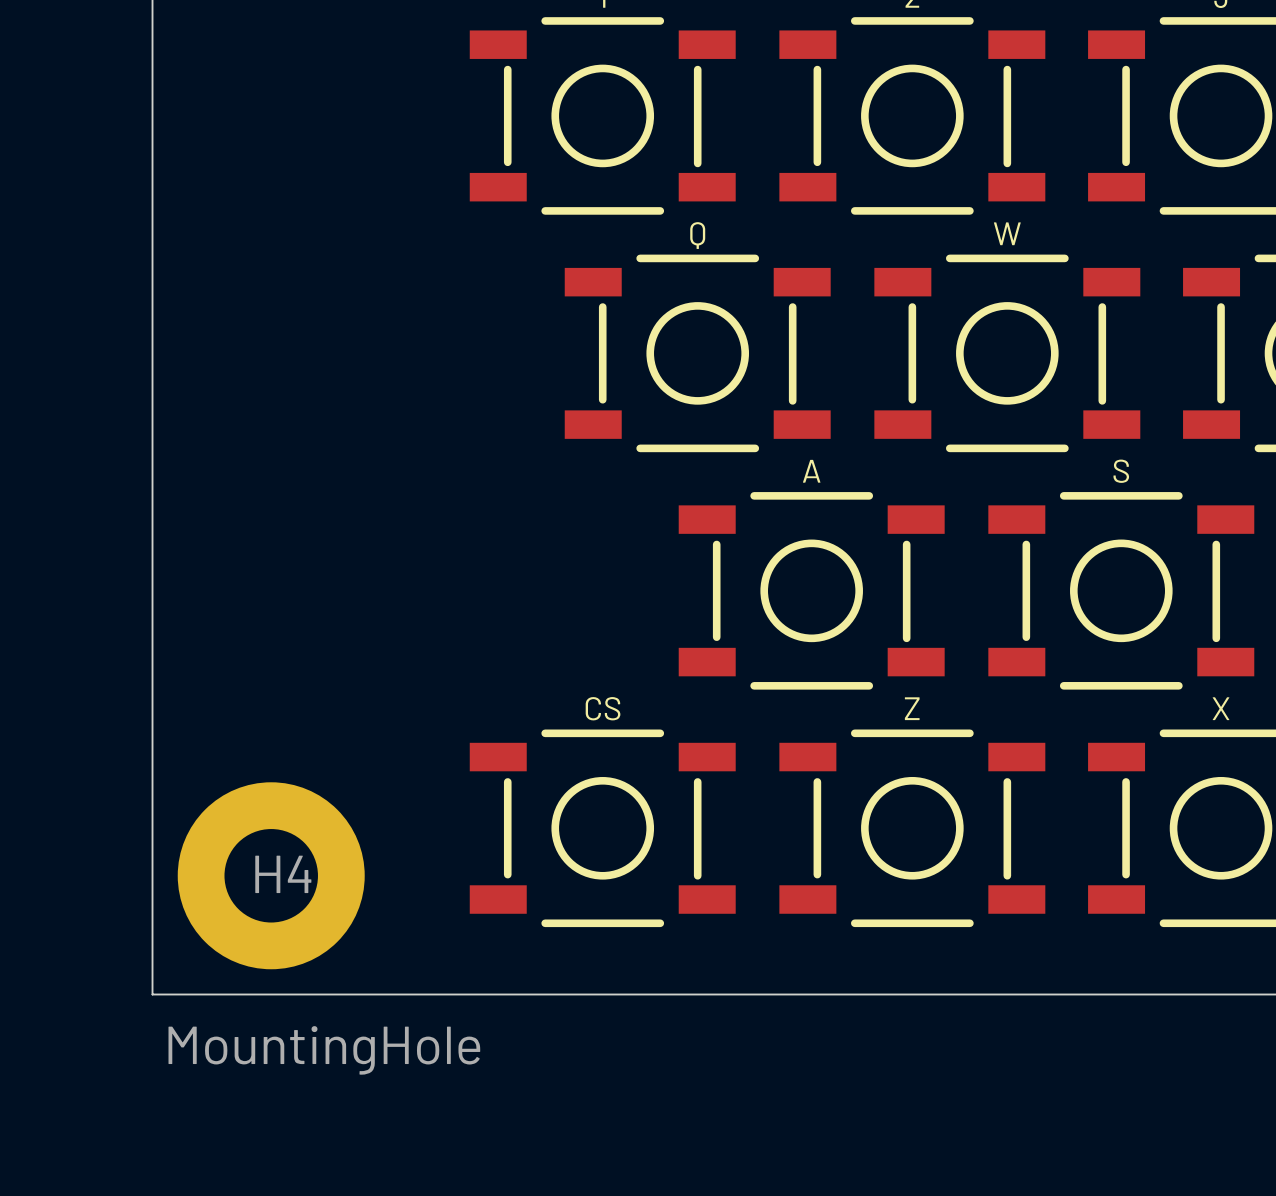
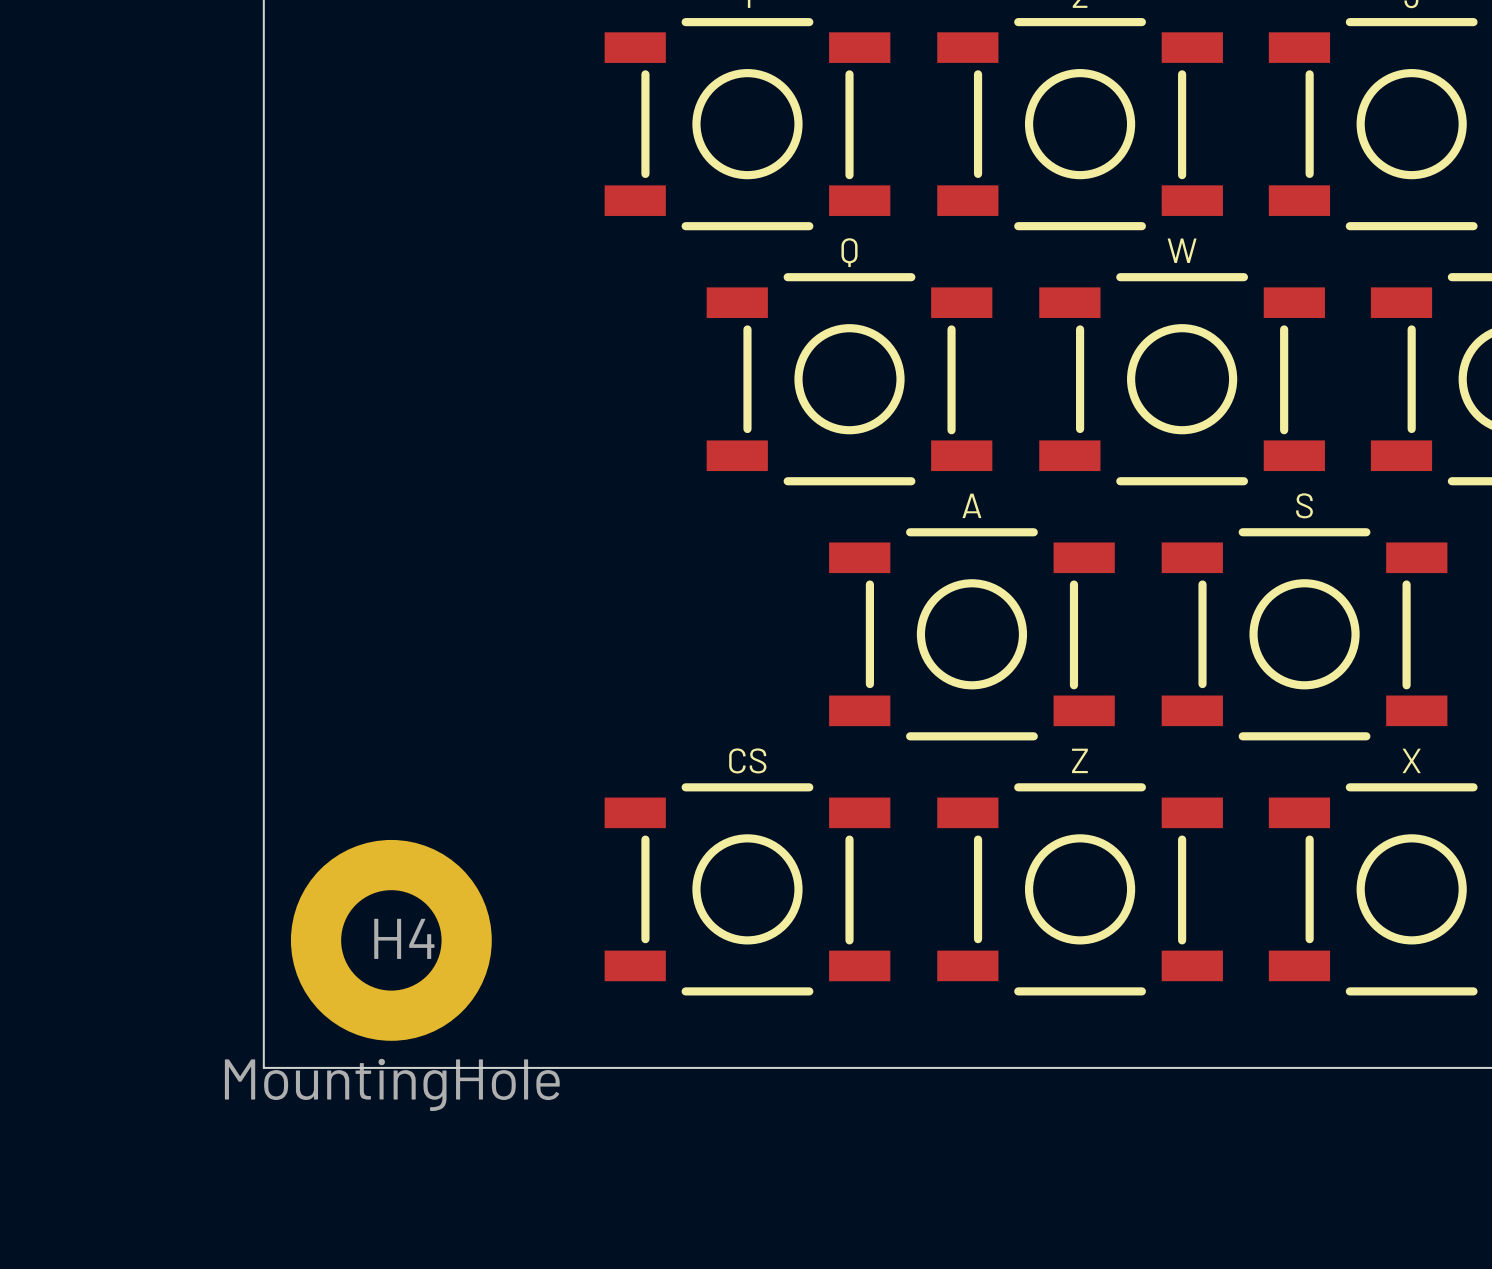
H4 value position: MountingHole (324, 1050) -> MountingHole (392, 1084)

